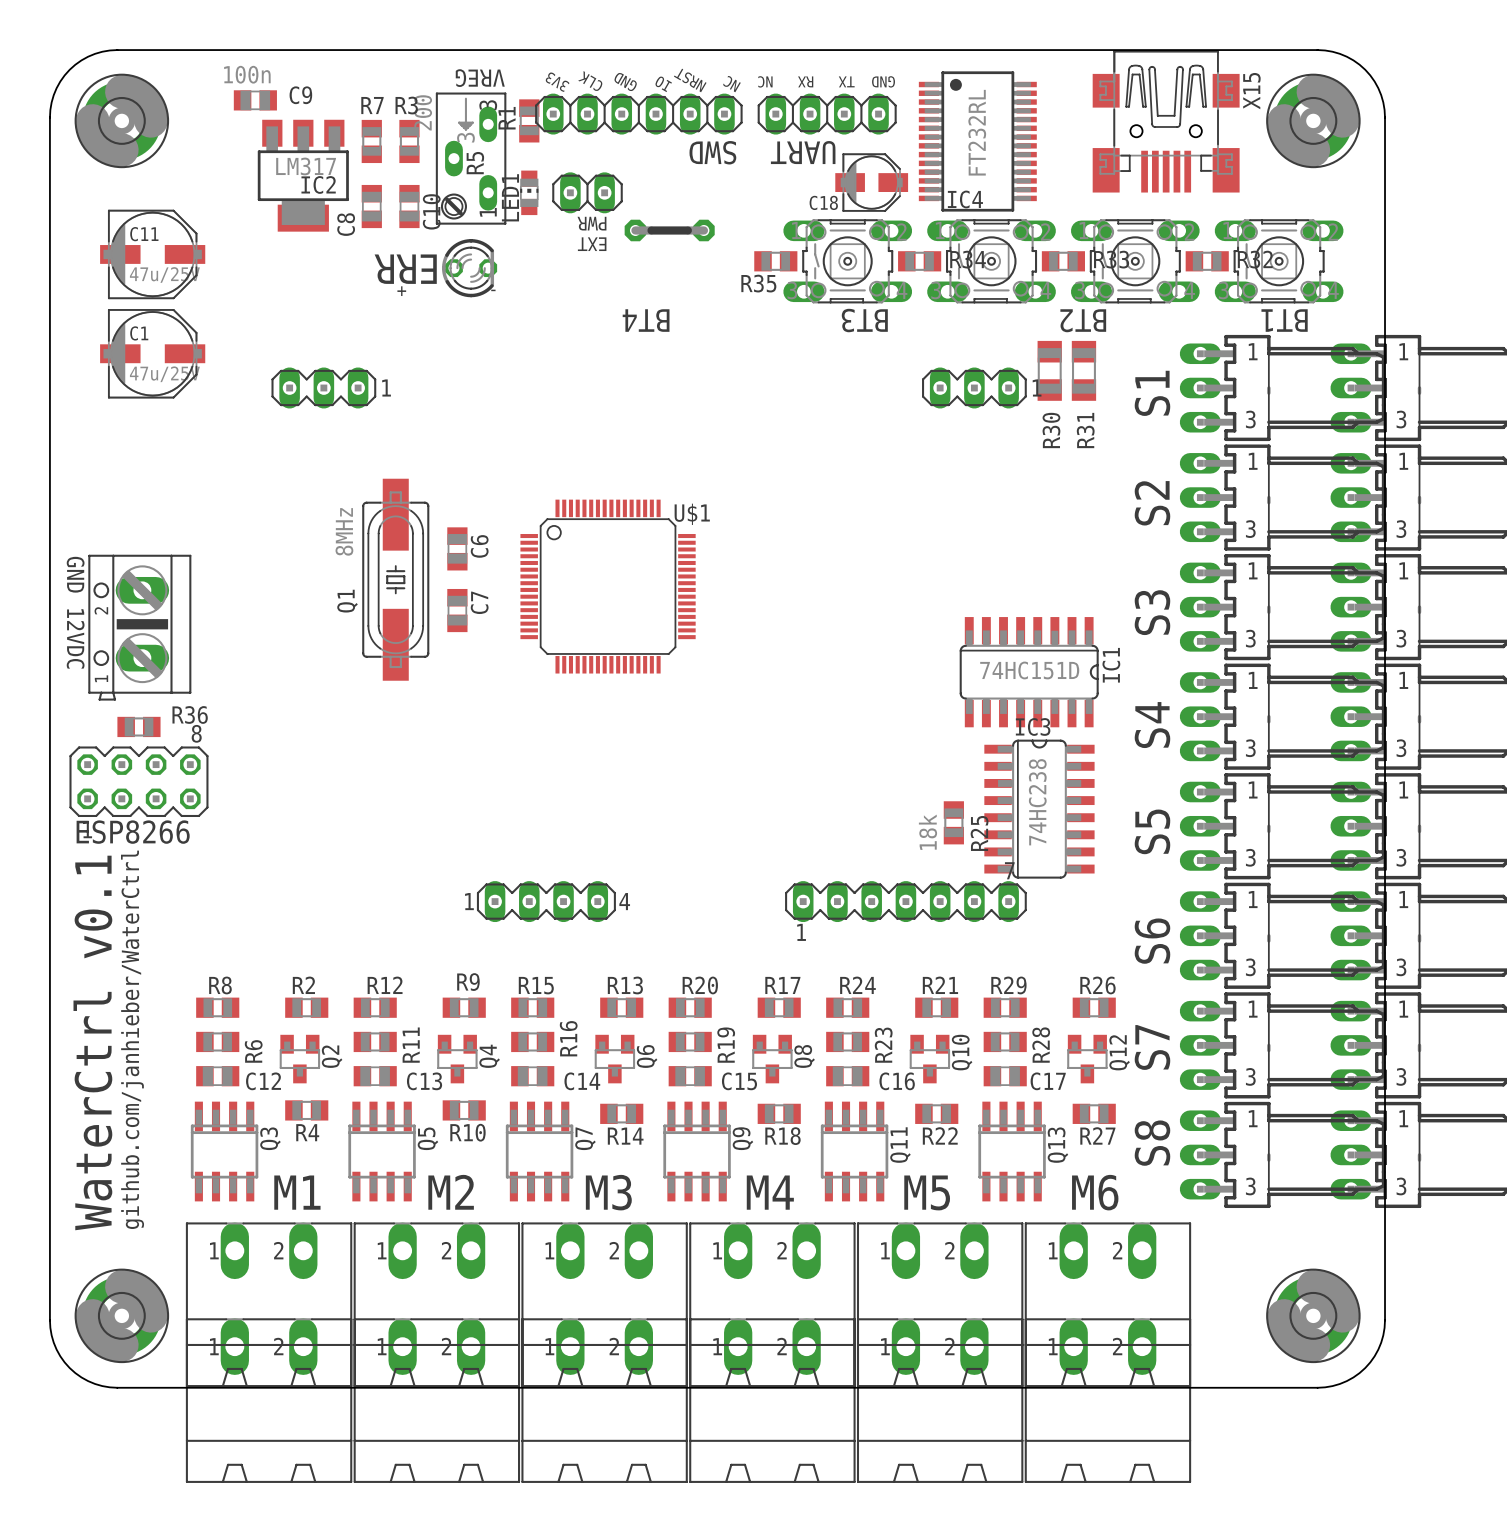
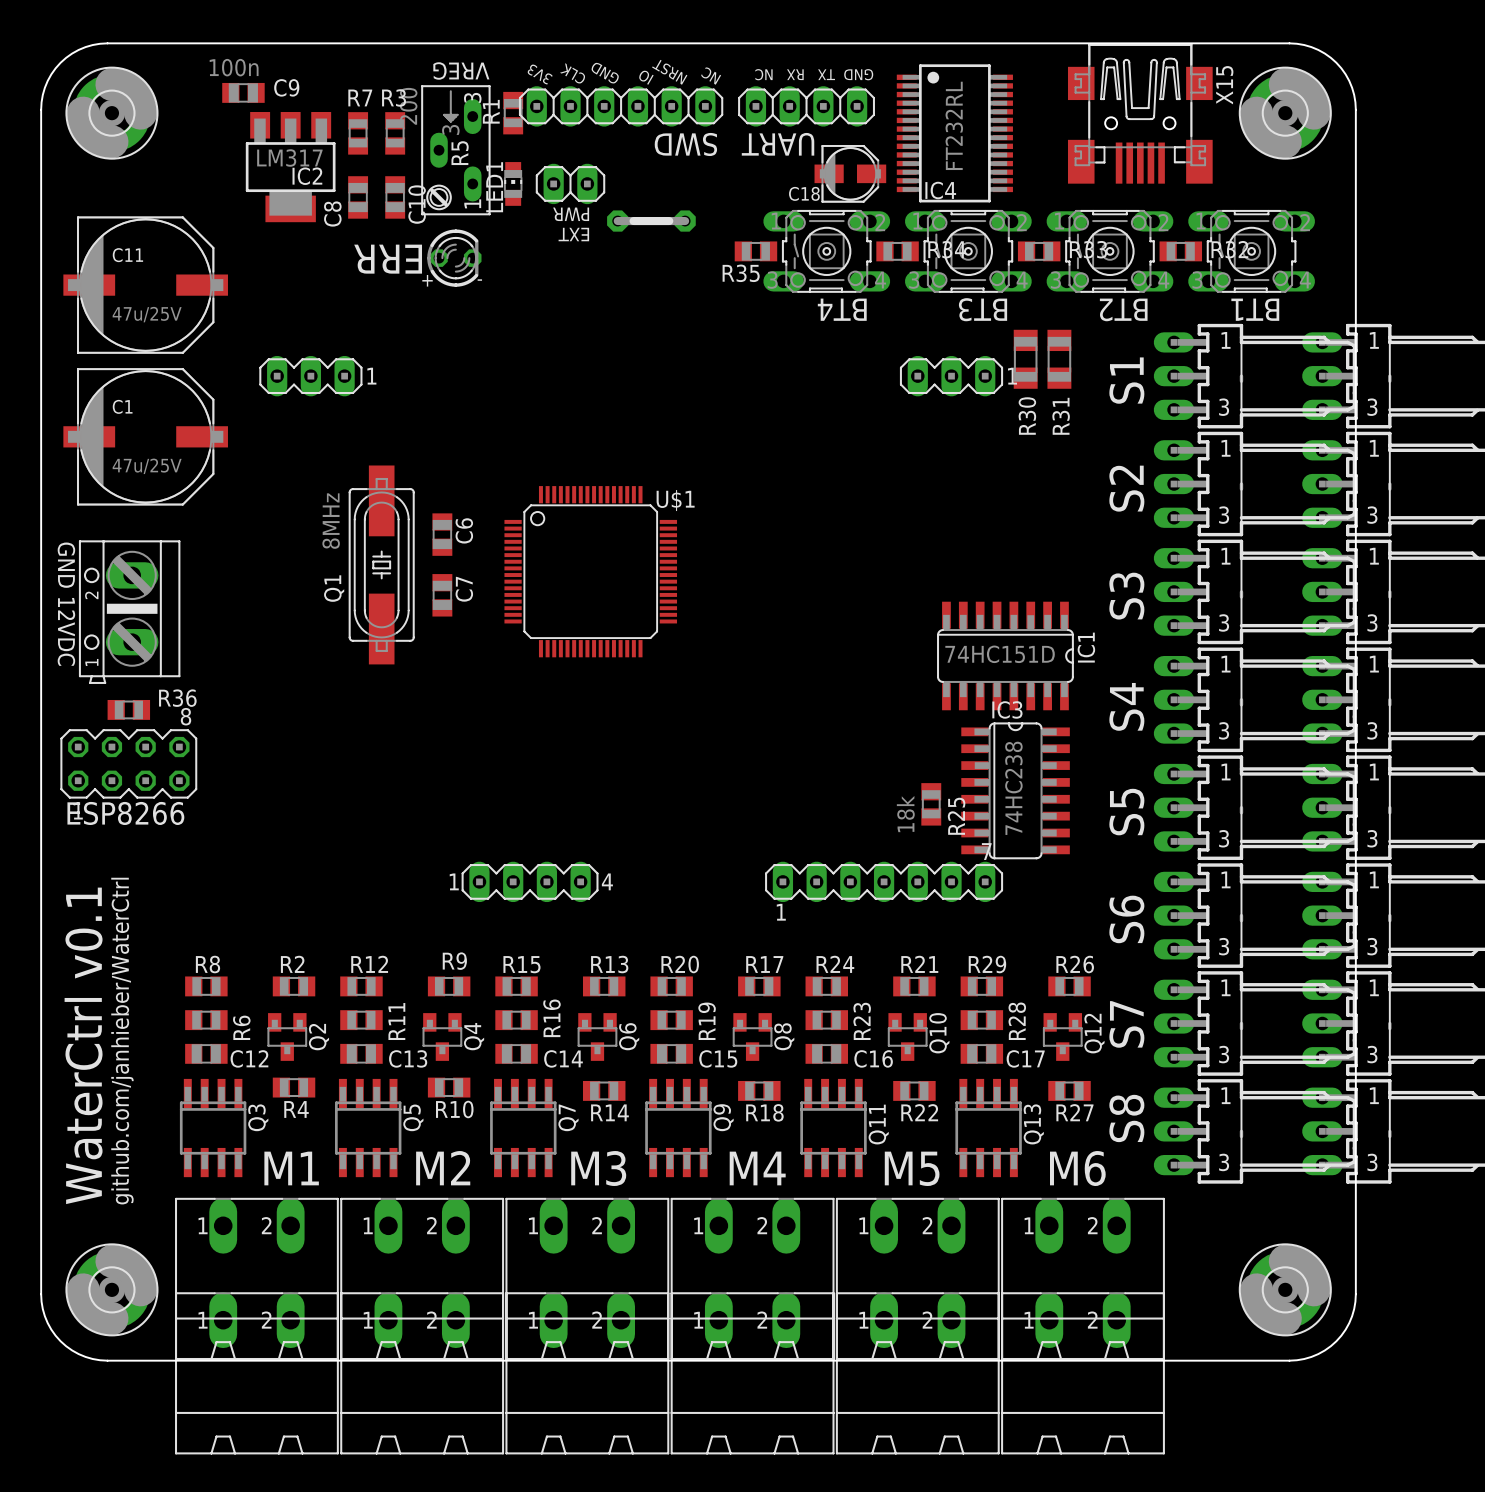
C11 footprint: [100, 209, 206, 299] -> [63, 216, 228, 354]
C1 footprint: [100, 309, 206, 399] -> [63, 368, 228, 506]

